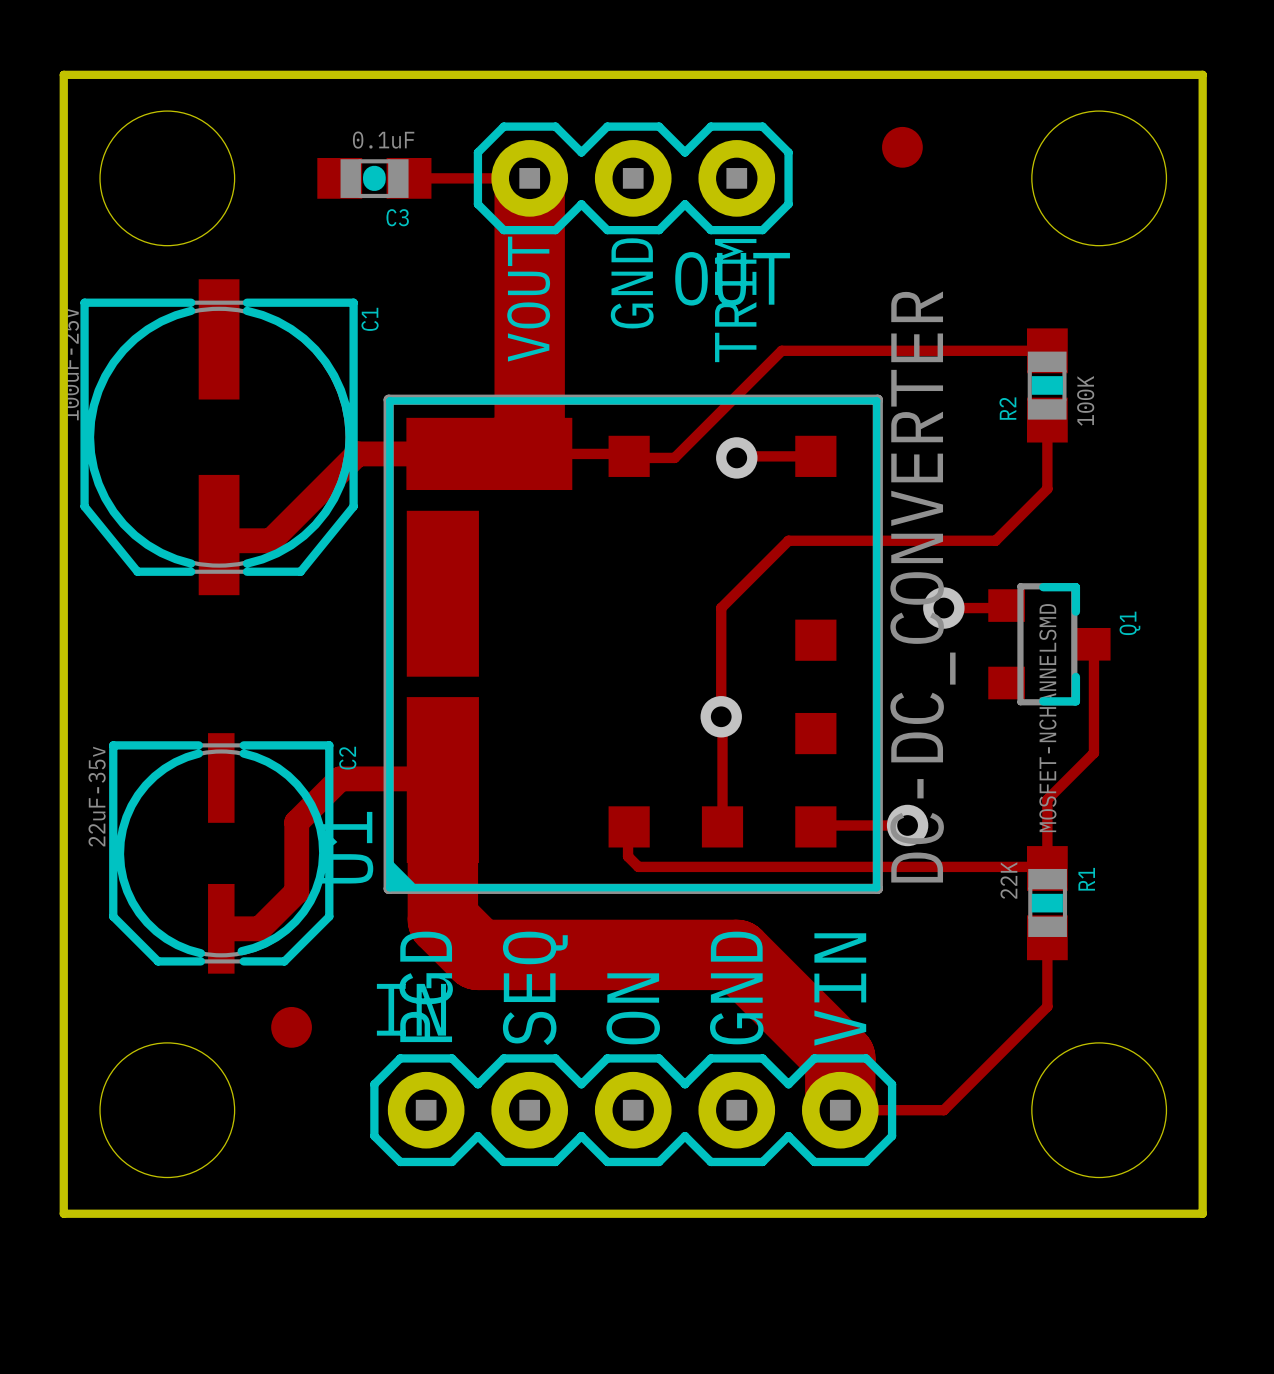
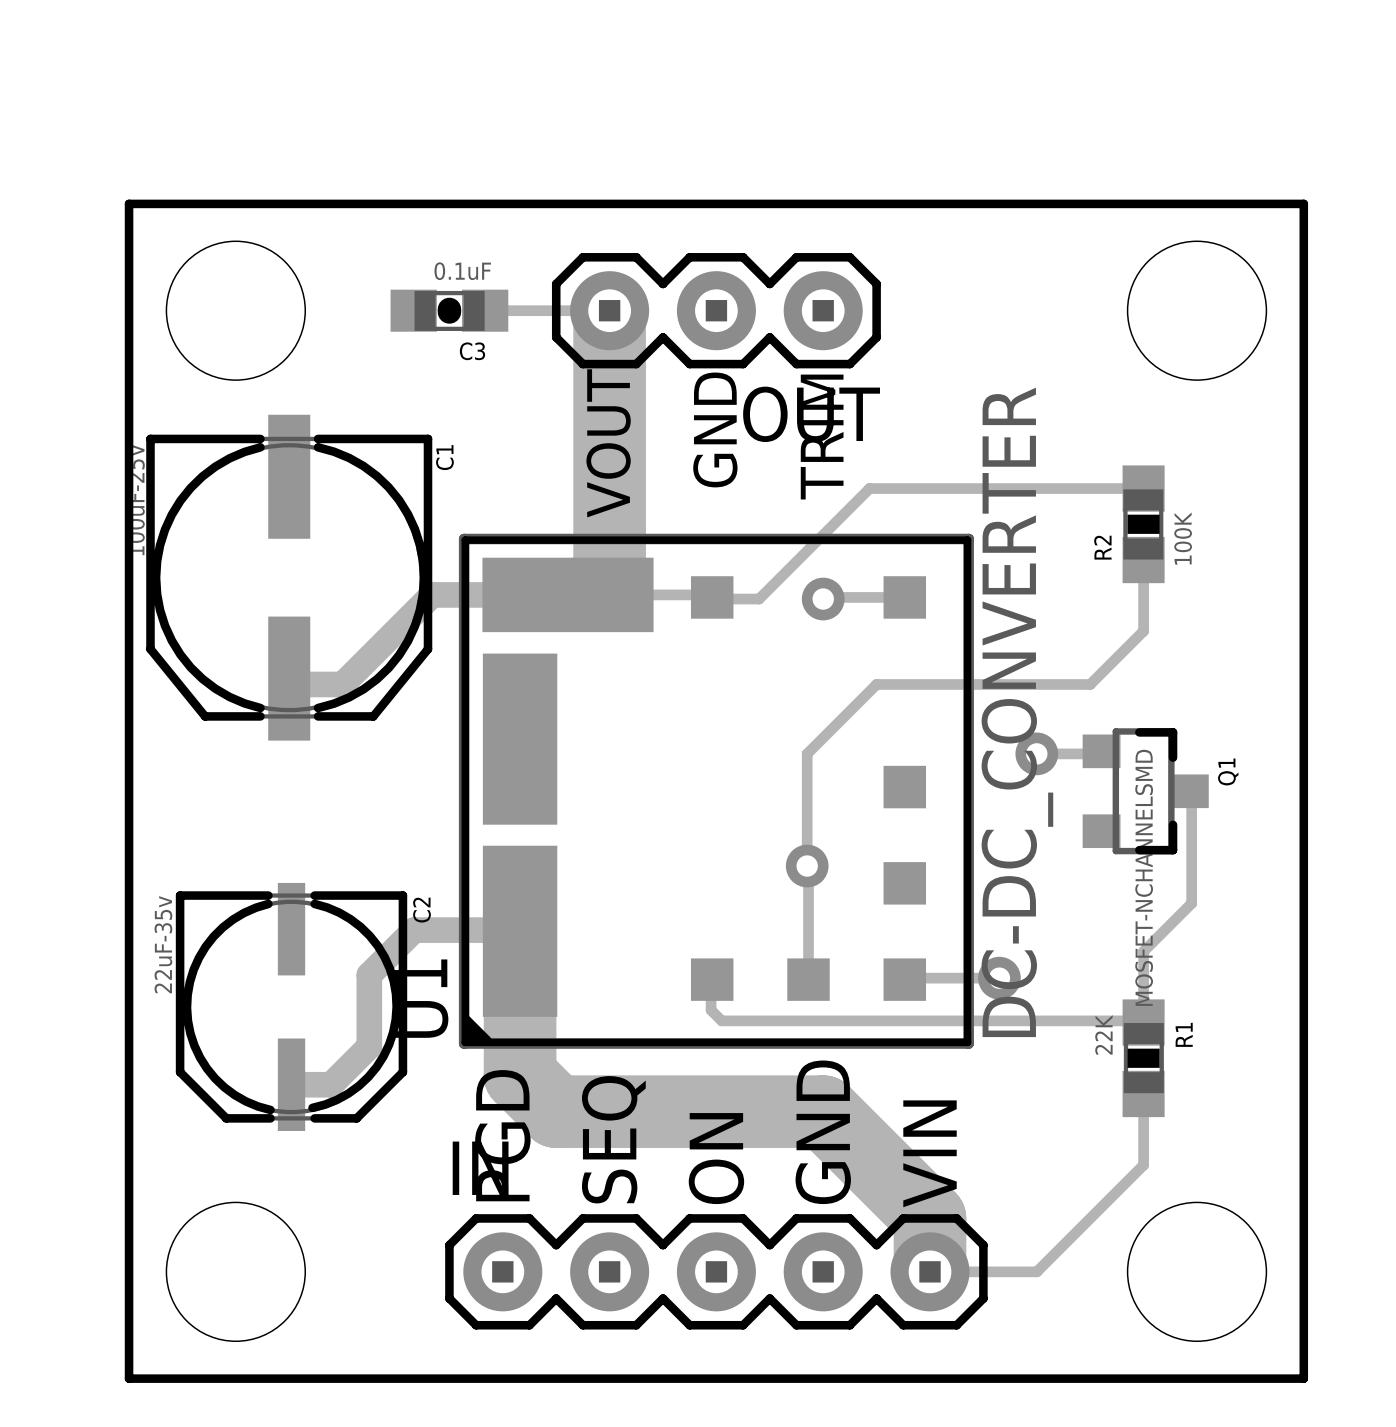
part: (902, 147) -> none
part: (291, 1027) -> none

